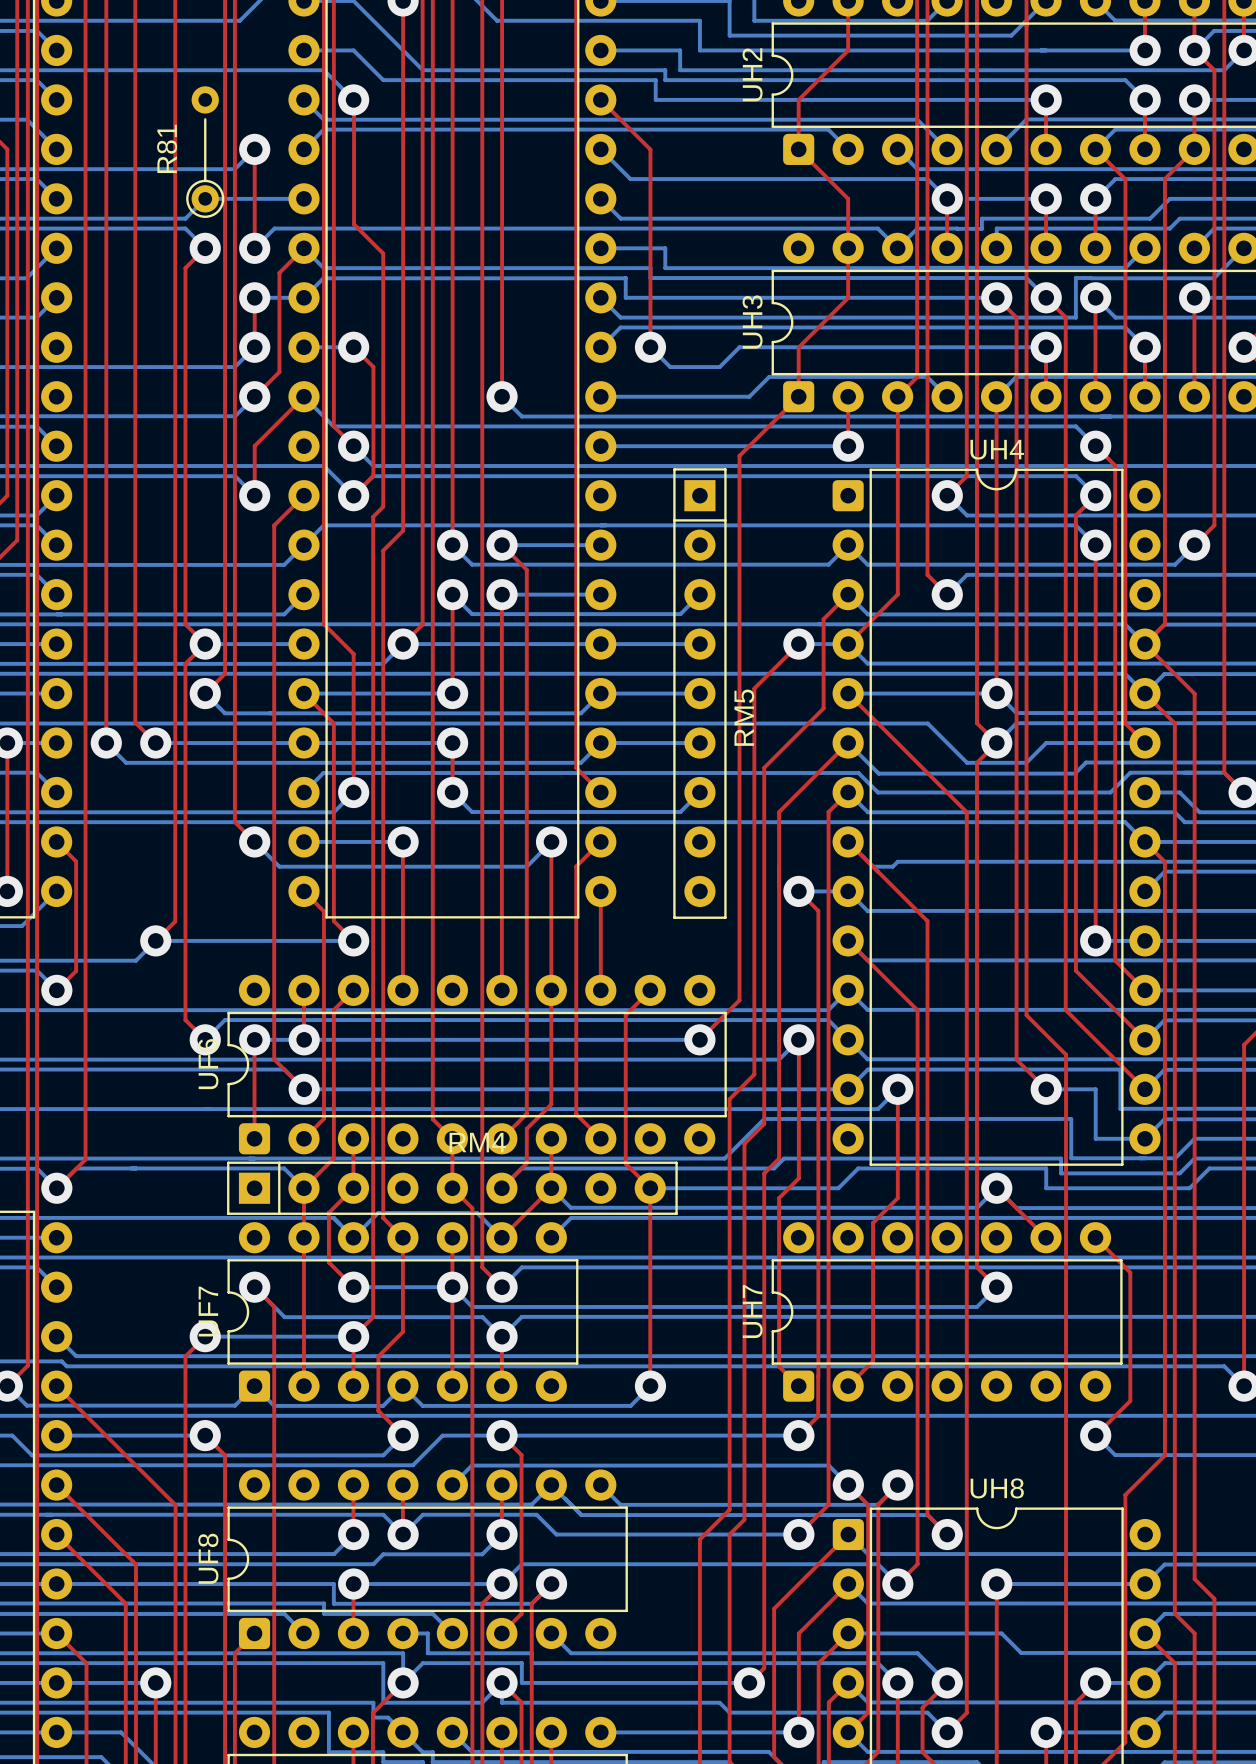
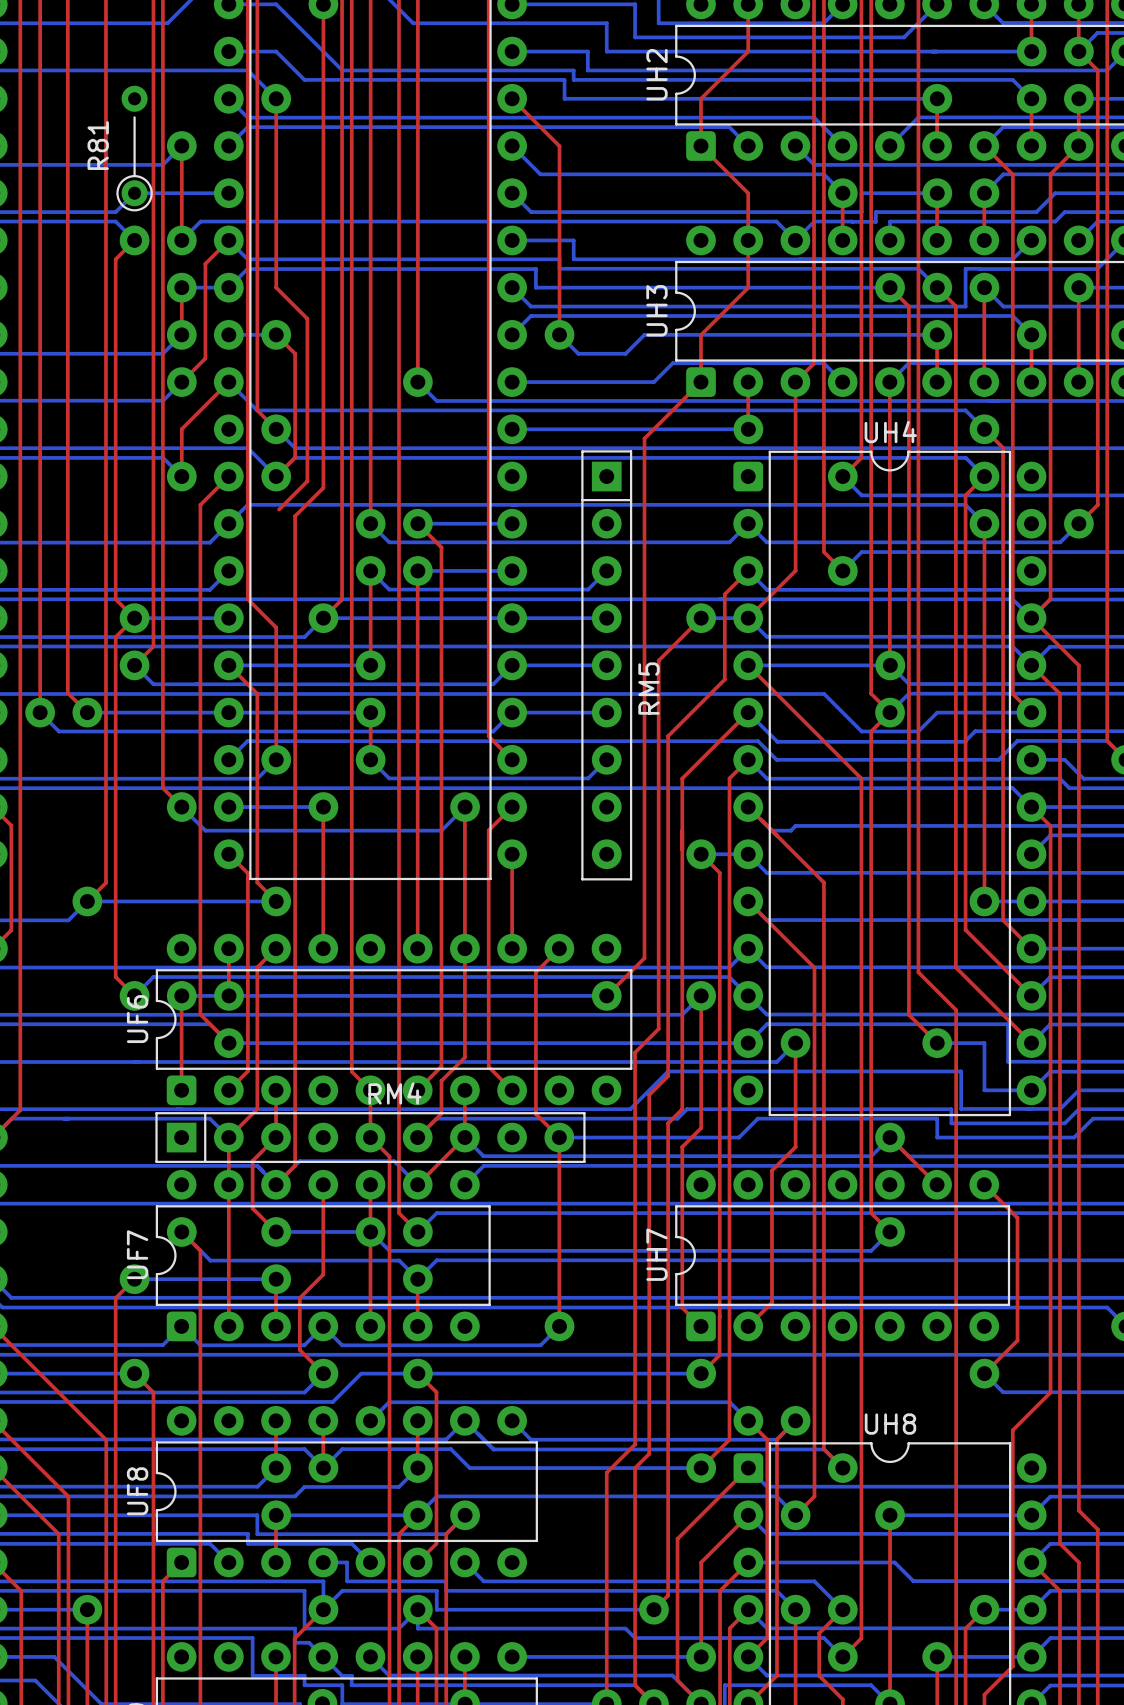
top track: (353, 99) (354, 224) (383, 253) (383, 506) (373, 516) (373, 1317) (353, 1336) -> (276, 98) (276, 287) (307, 318) (307, 481) (279, 509)
top track: (403, 507) (403, 530) (383, 550) (383, 1218) (402, 1237) -> (323, 487) (295, 516) (295, 1165) (276, 1184)

